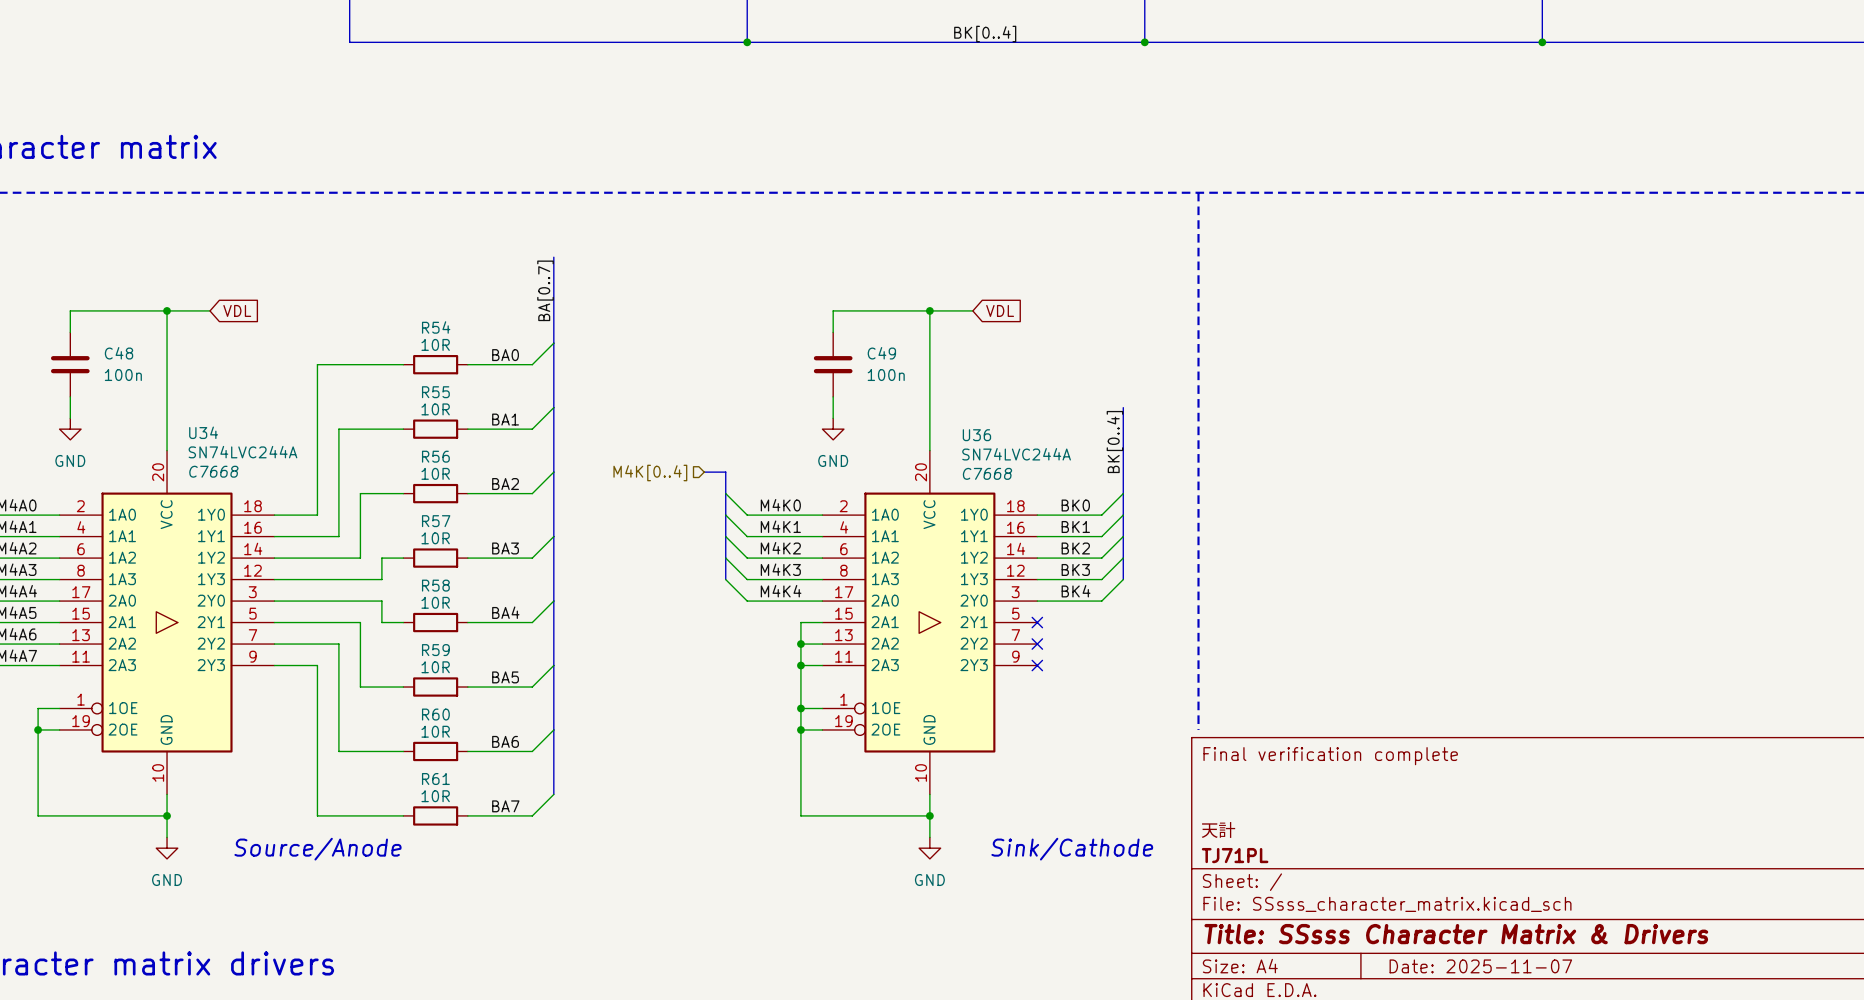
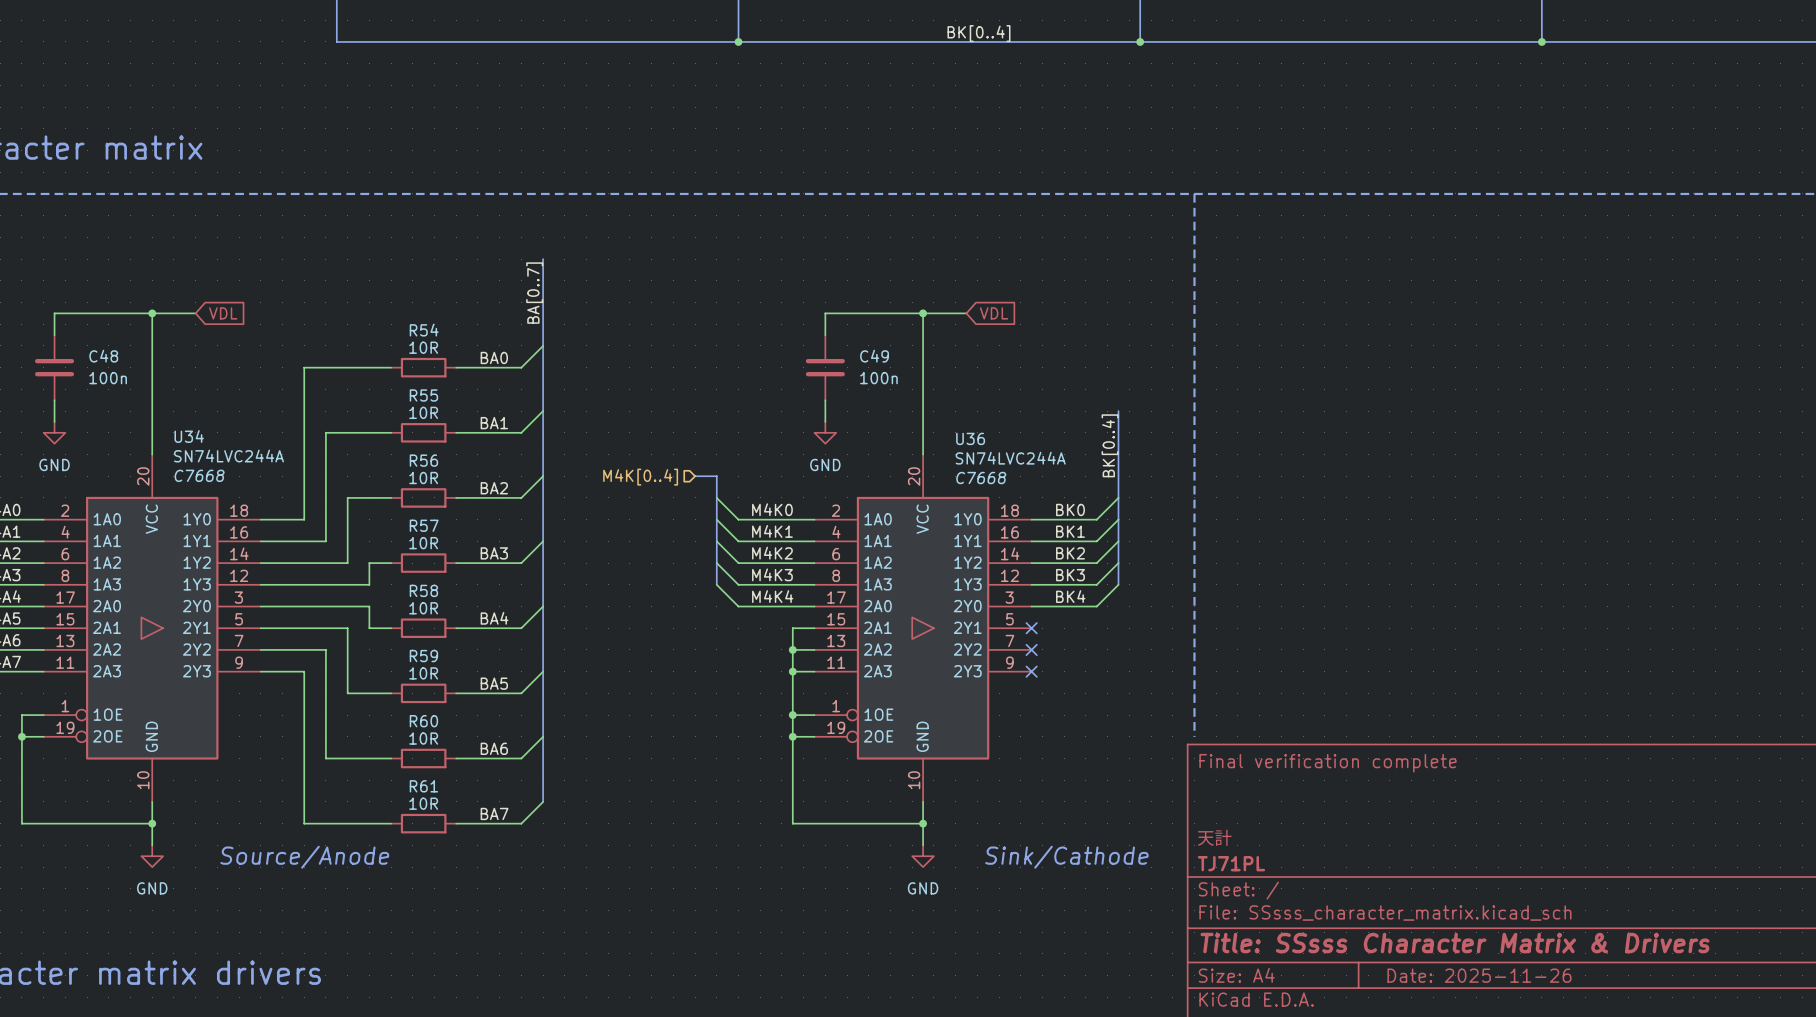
title block: Date: 2025-11-07 (1480, 966) -> Date: 2025-11-26 (1479, 975)

